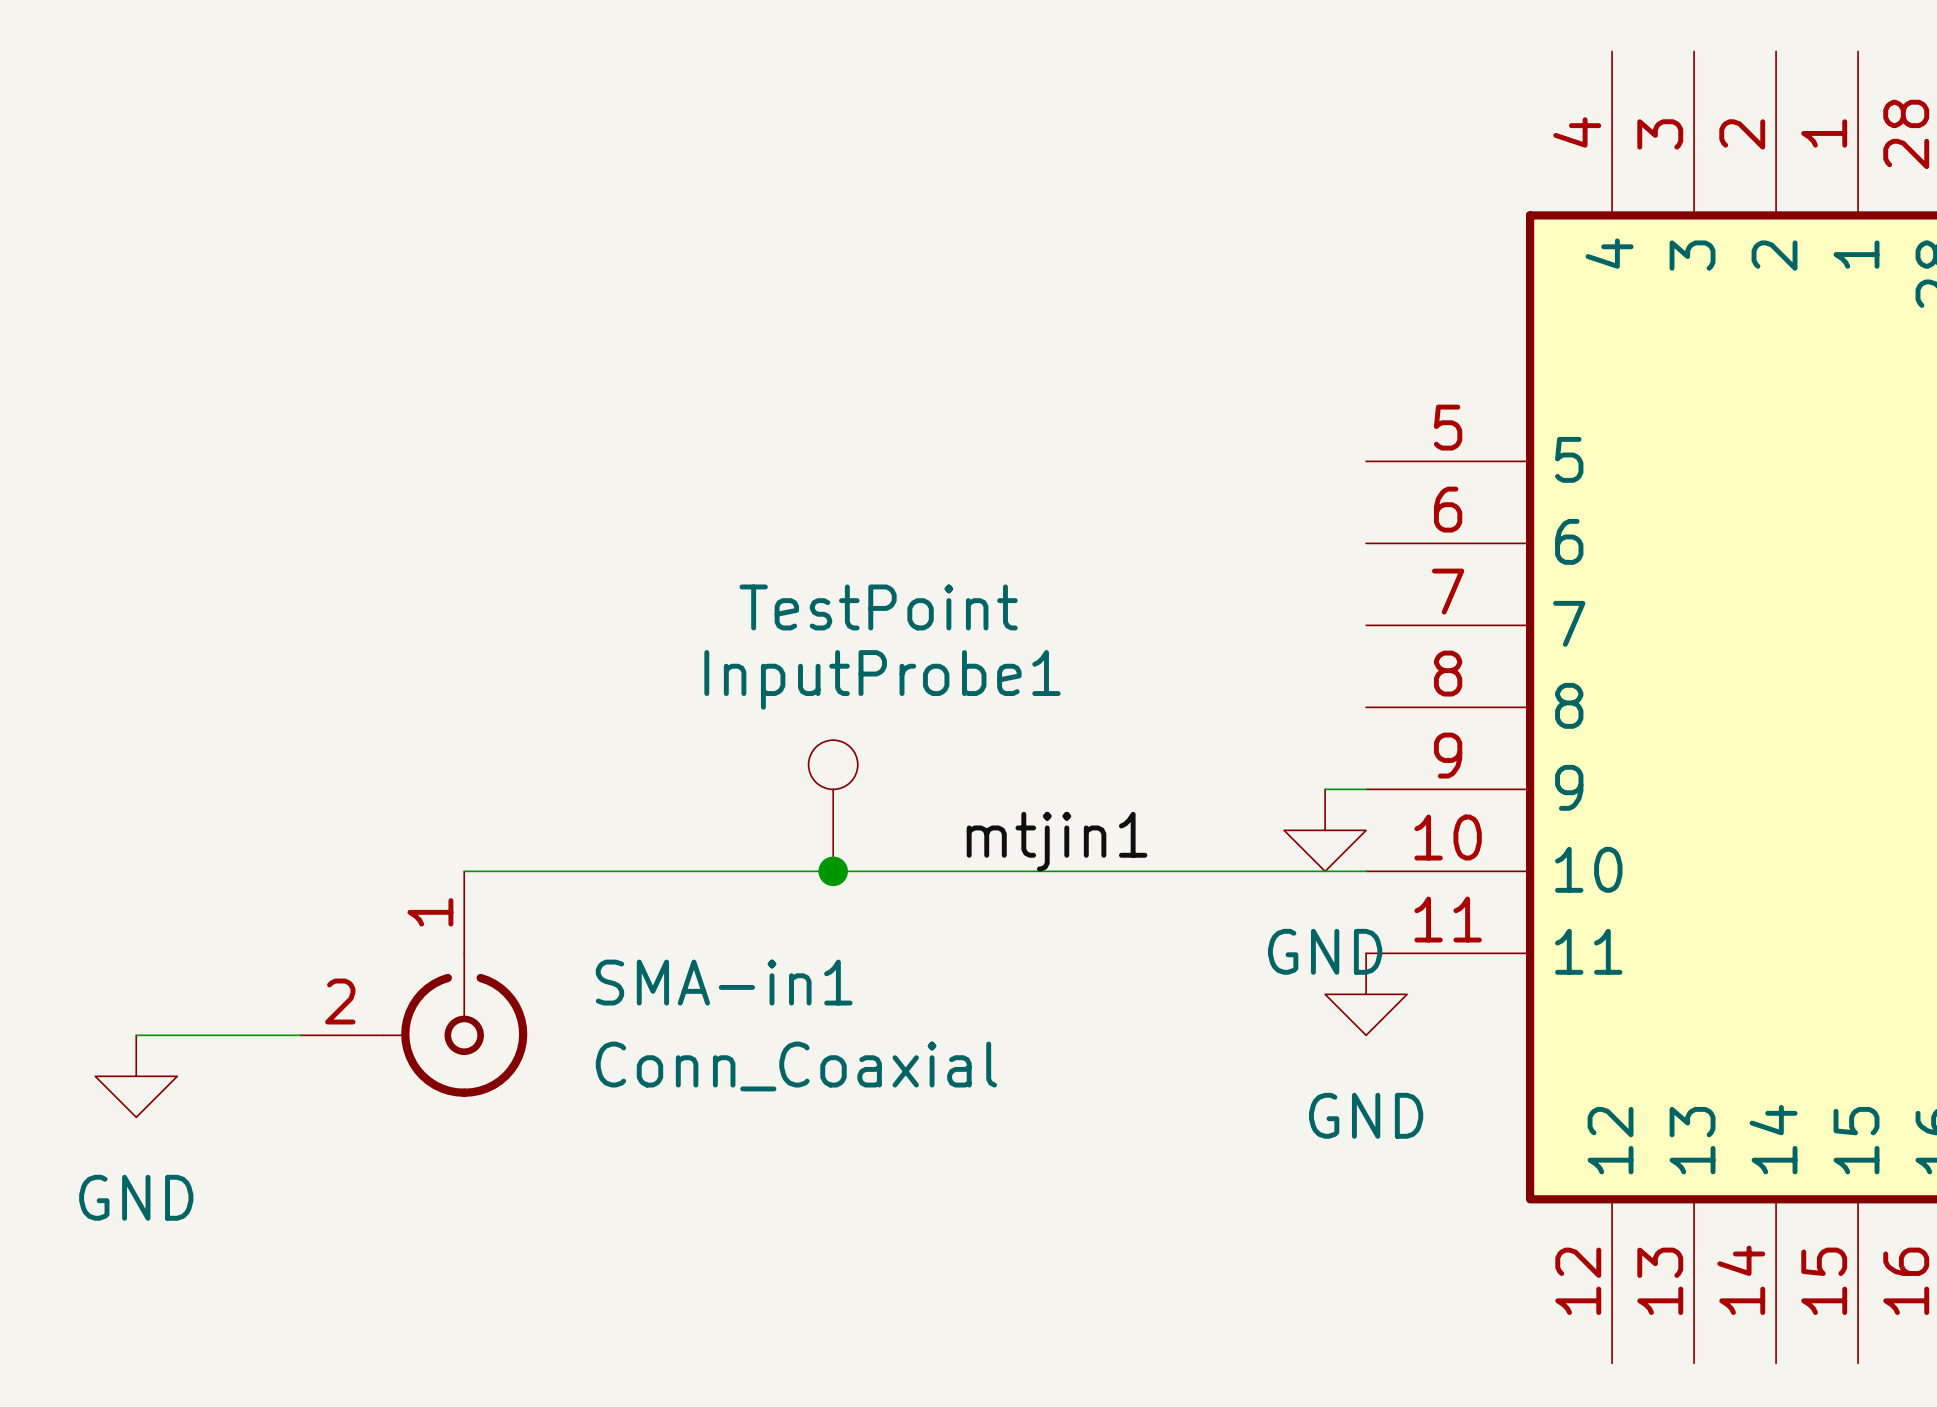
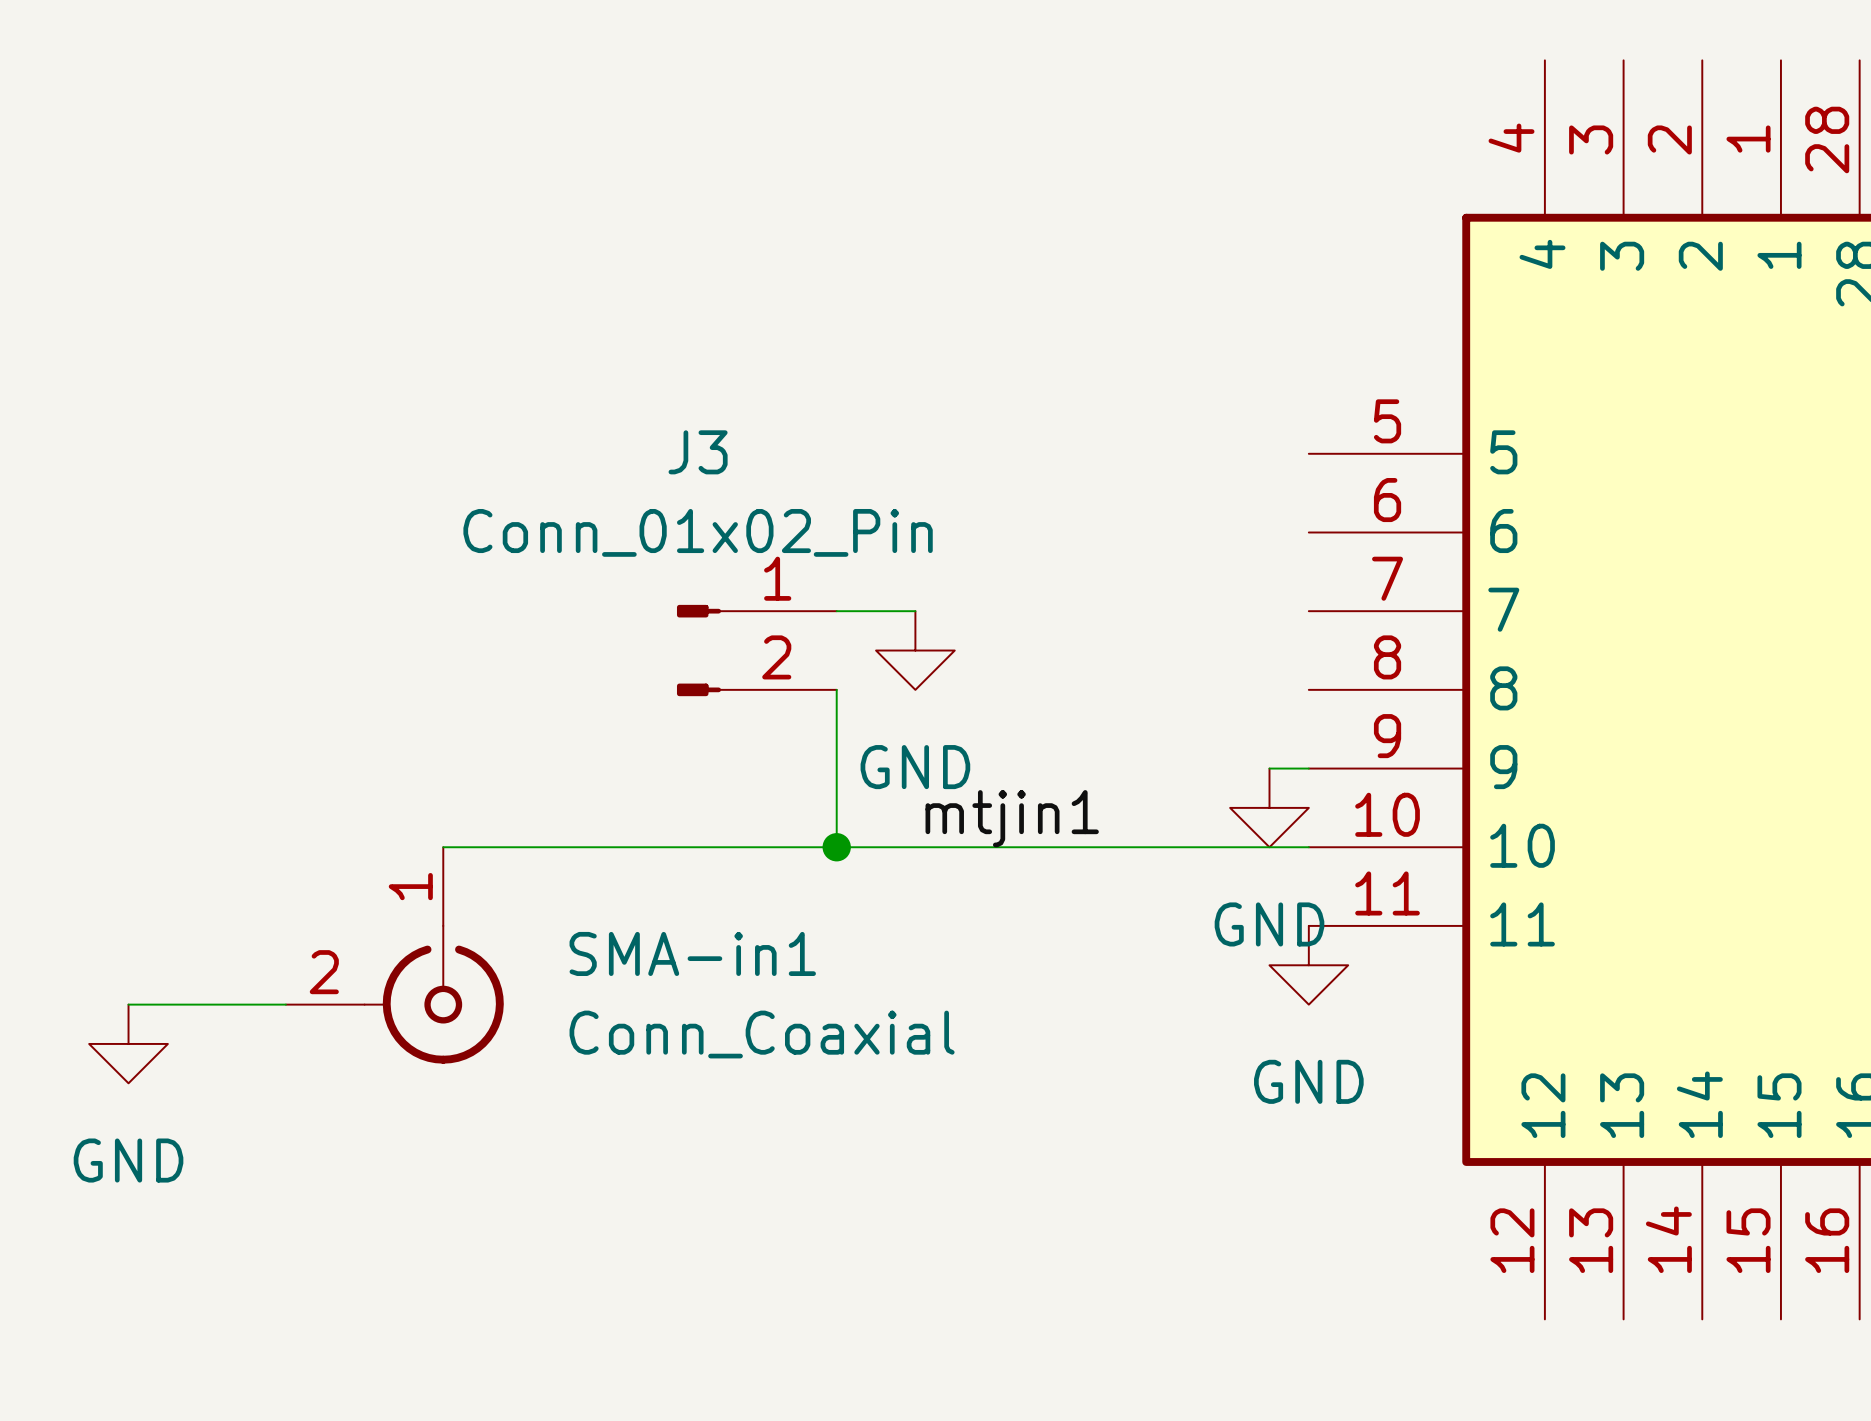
wire: none -> (836, 611) (915, 611)
J3: none -> Conn_01x02_Pin (756, 650)
power symbol: none -> GND (915, 650)
wire: none -> (836, 689) (836, 847)
InputProbe1: TestPoint (833, 805) -> none
junction position: (833, 871) -> (836, 847)

